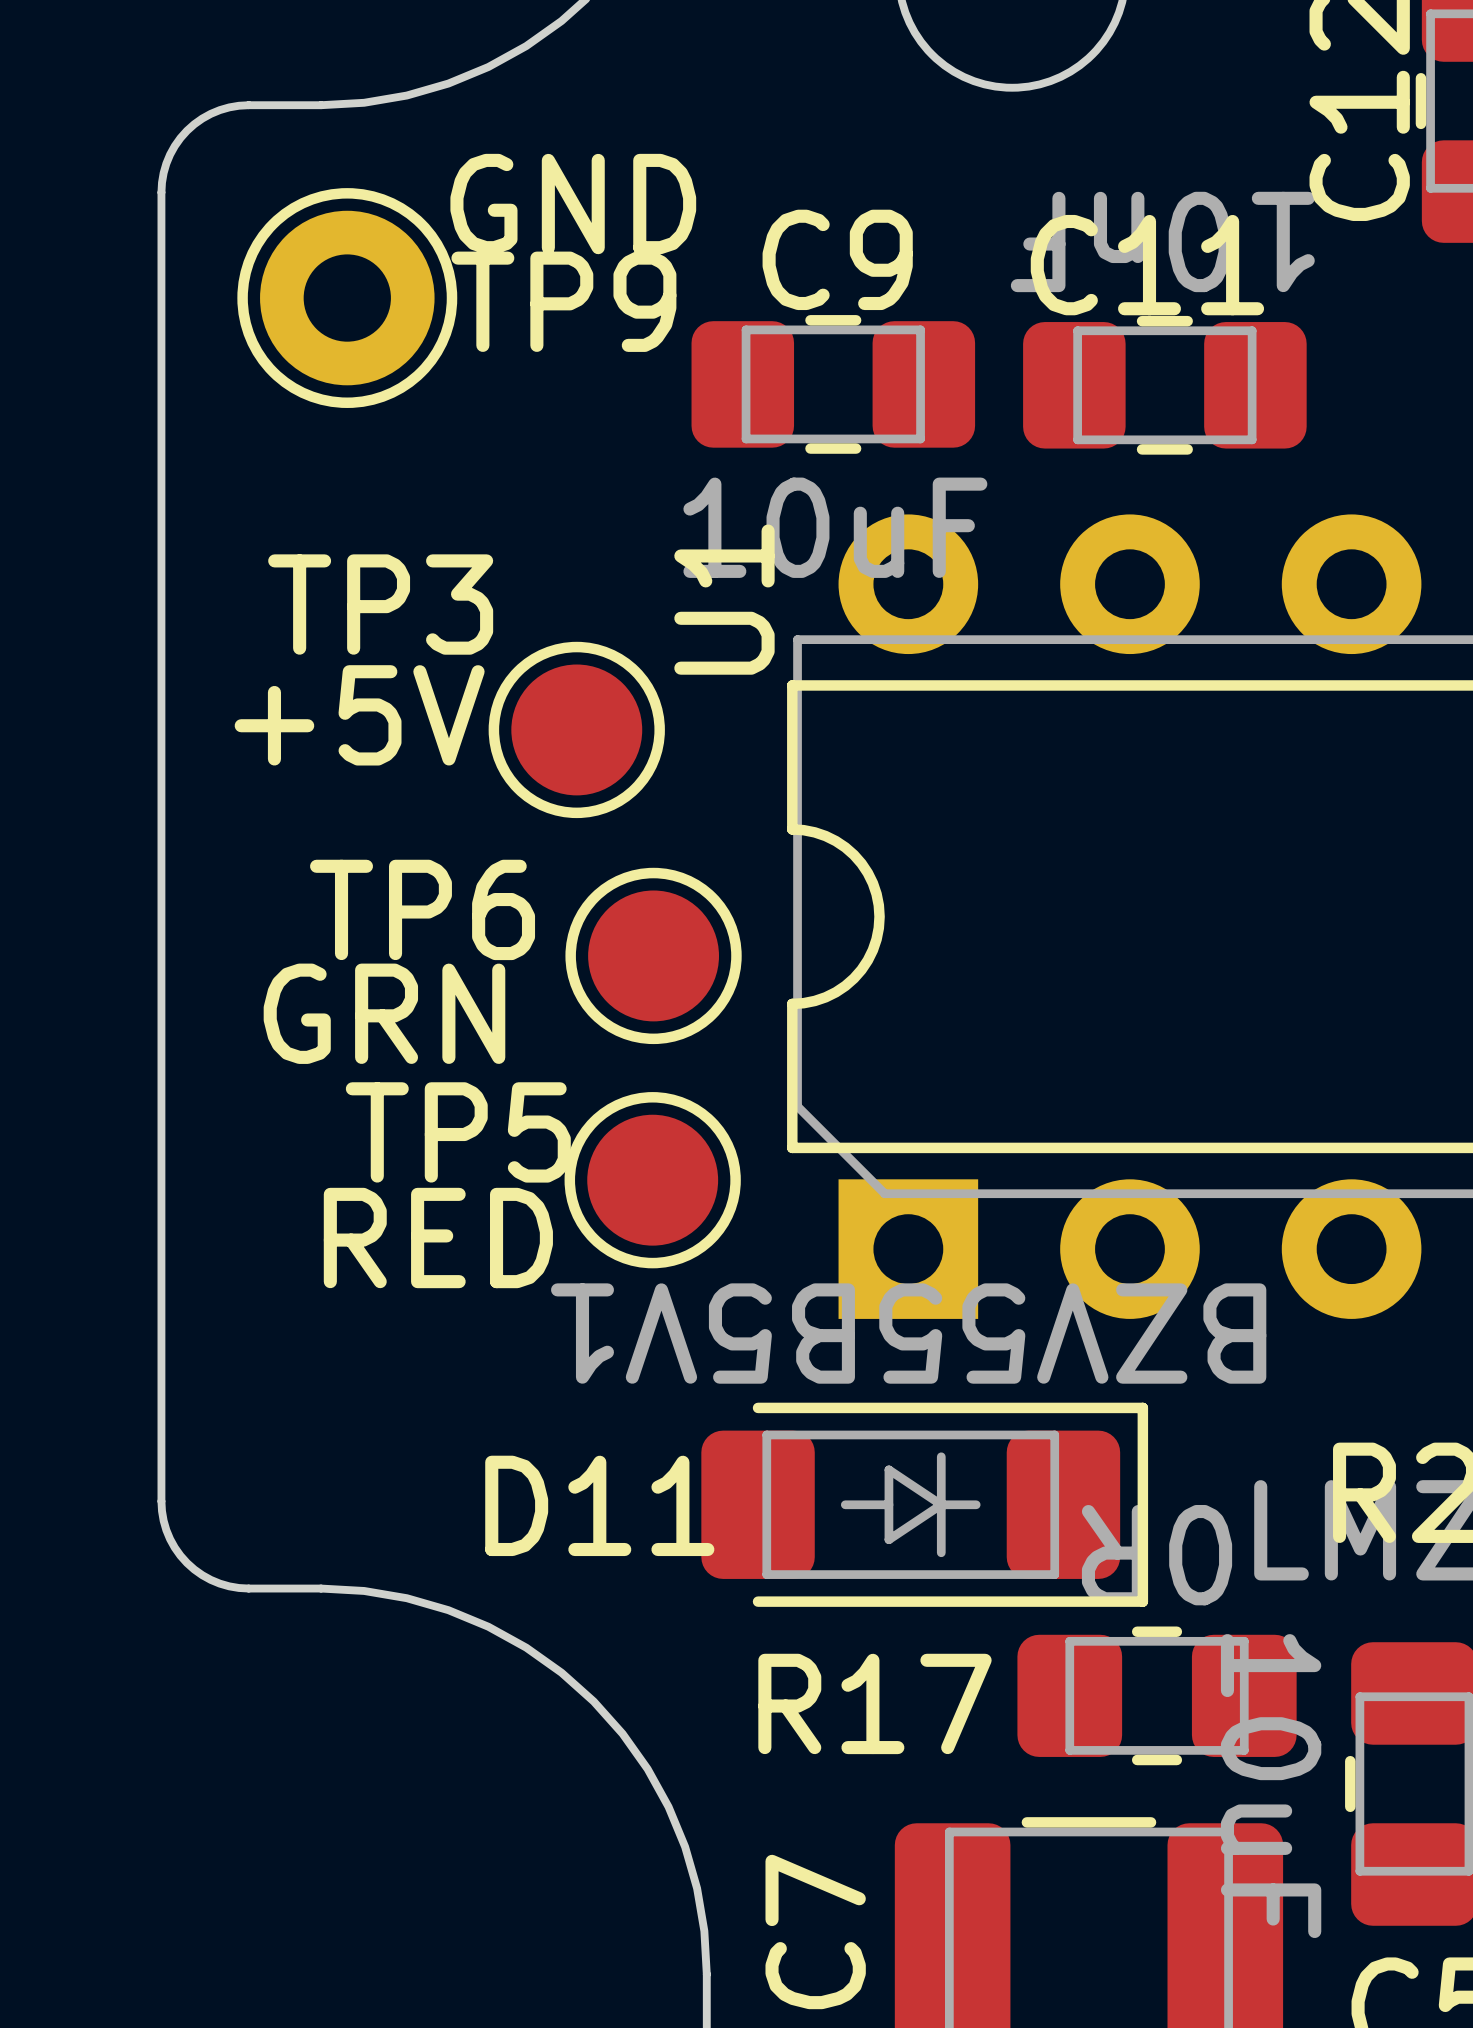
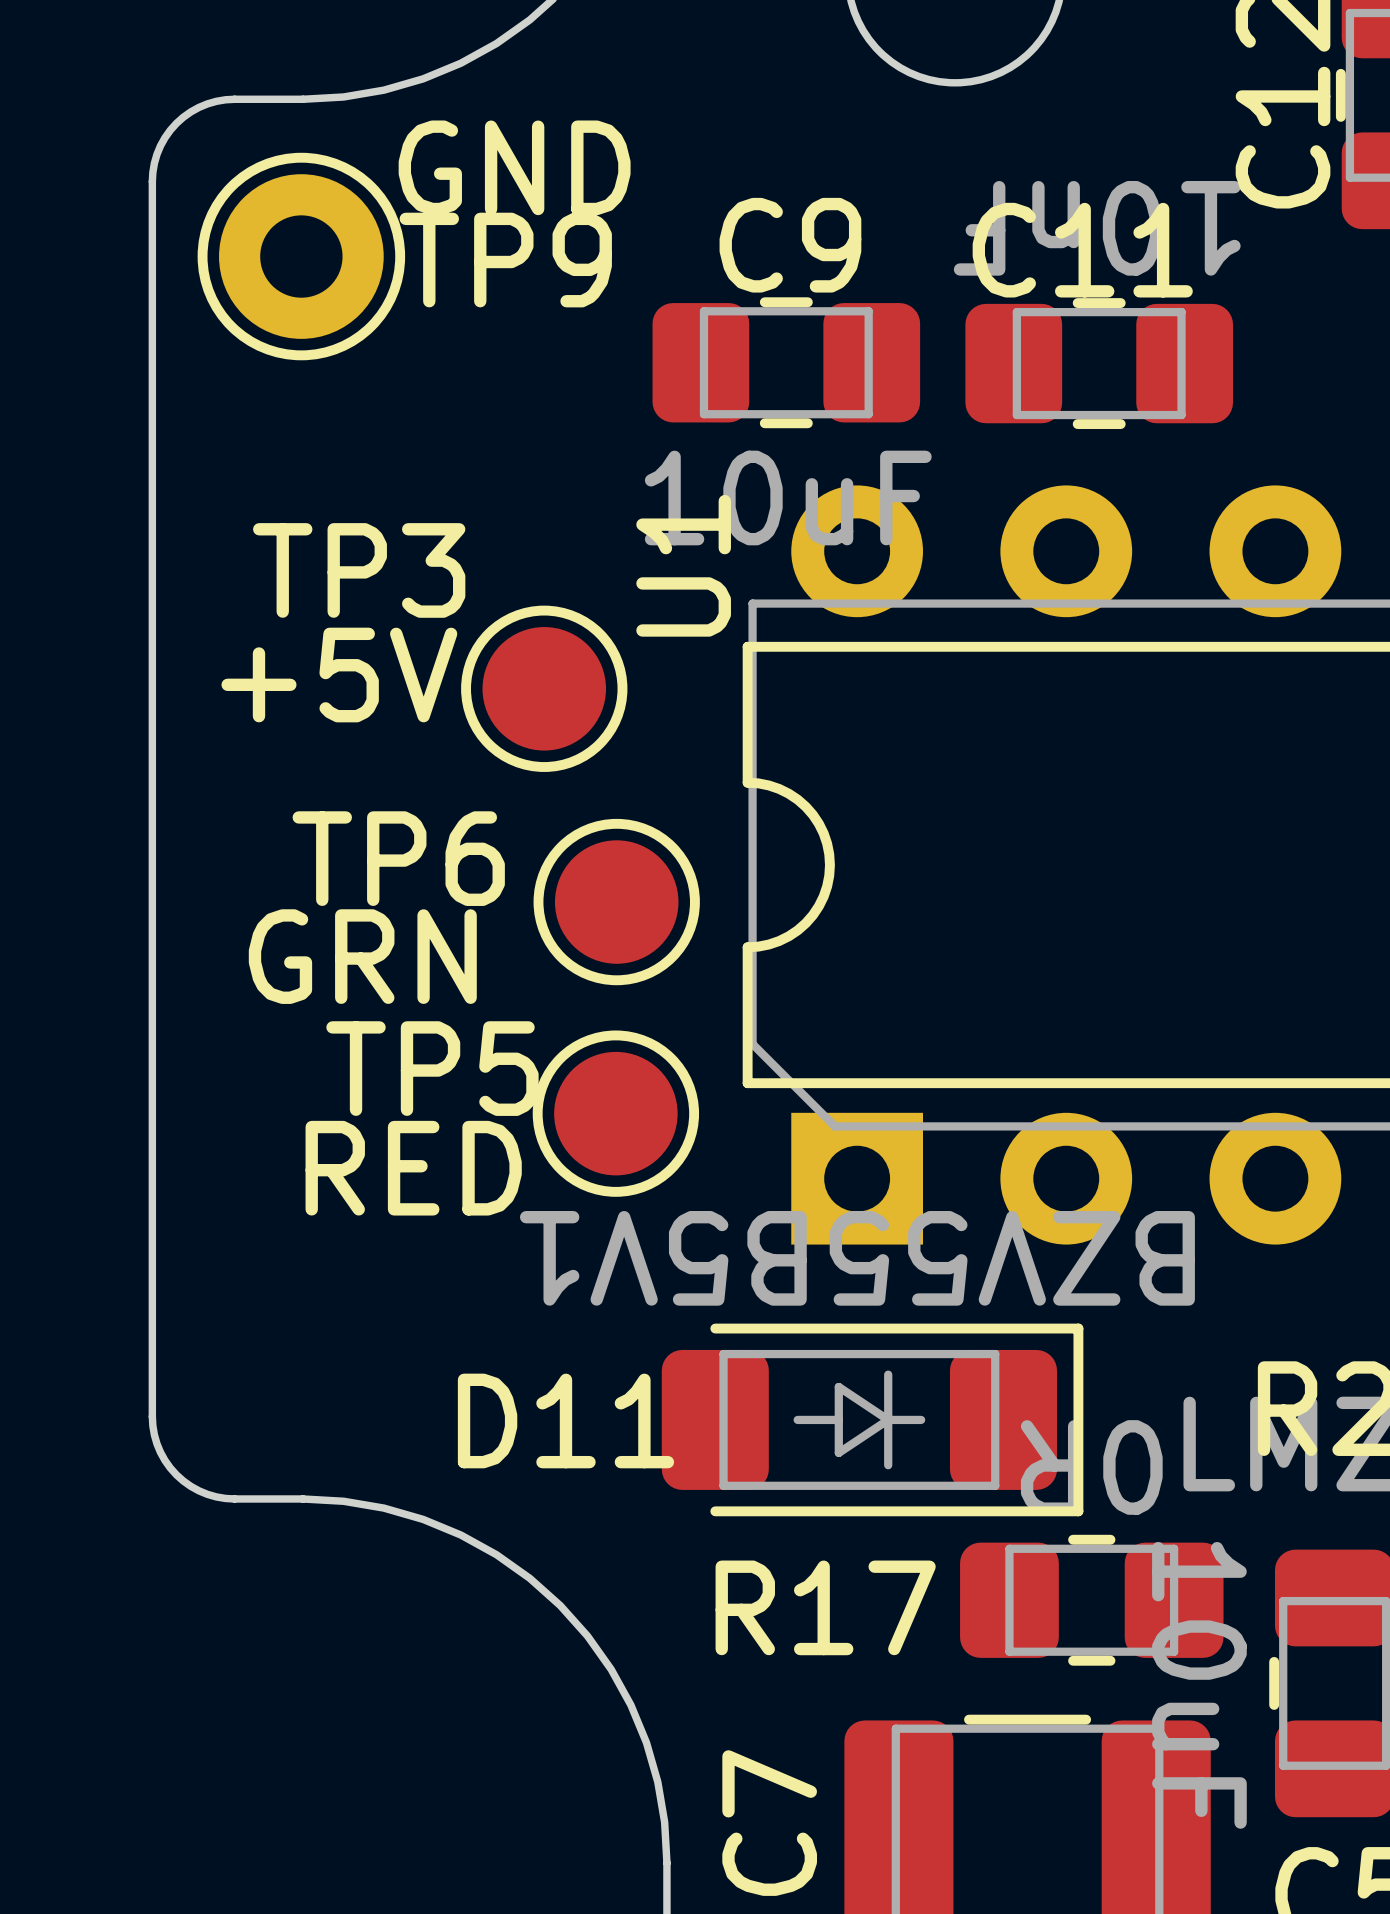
TP9 position: (347, 298) -> (301, 256)

